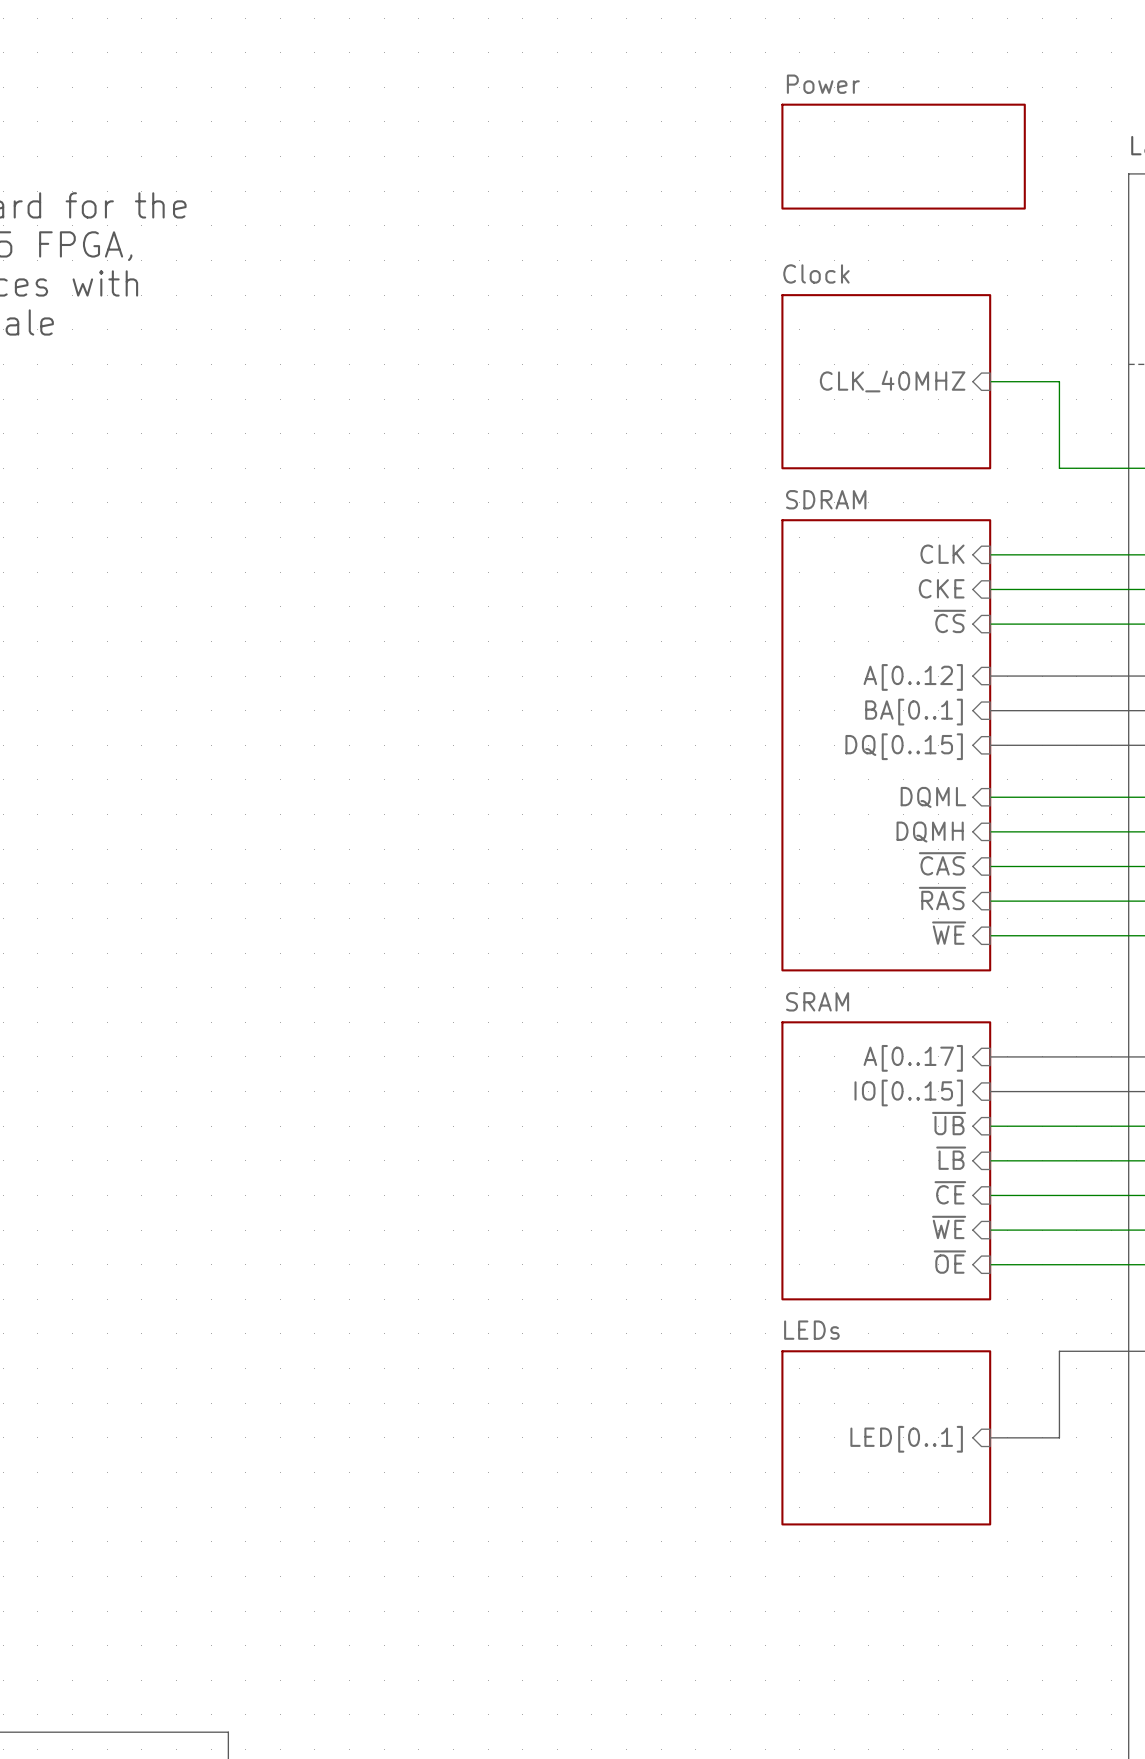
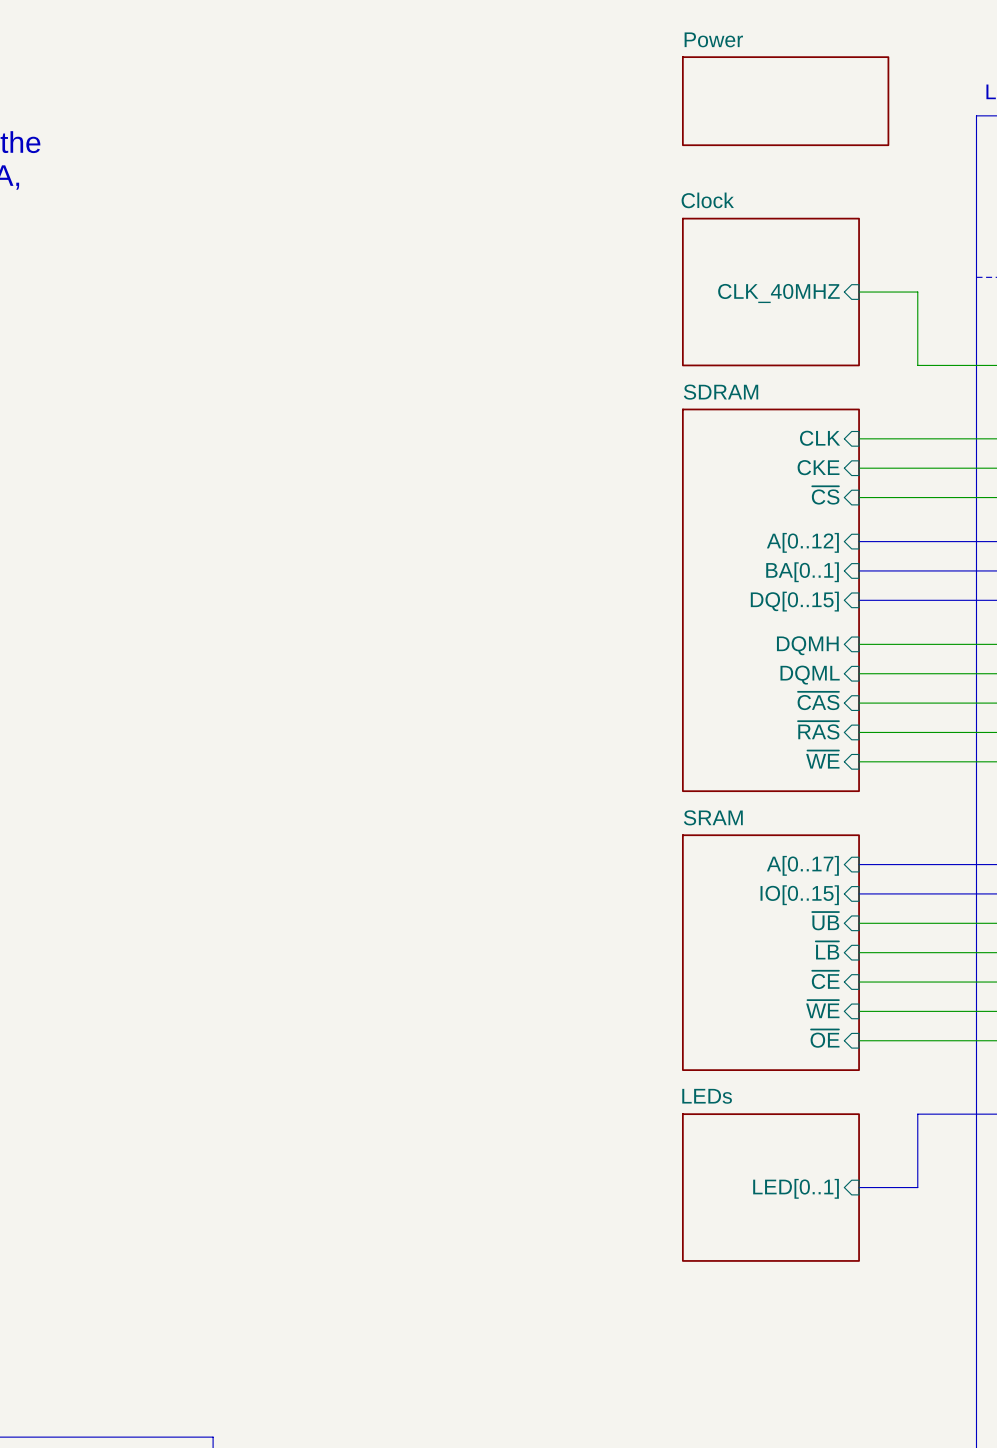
sheet pin: DQML (933, 797) -> DQMH (807, 645)
sheet pin: DQMH (930, 832) -> DQML (810, 675)

